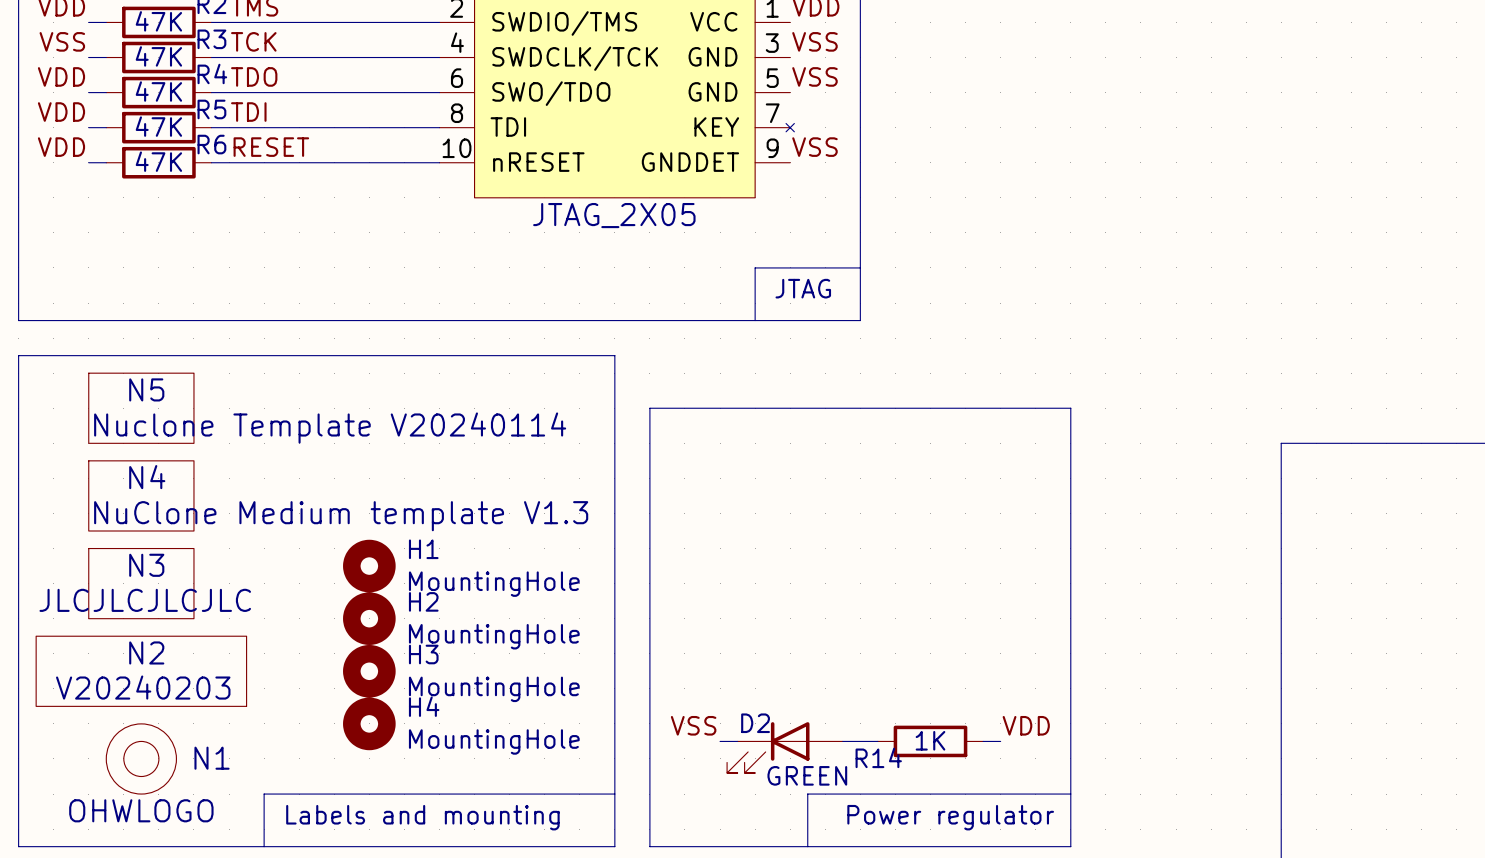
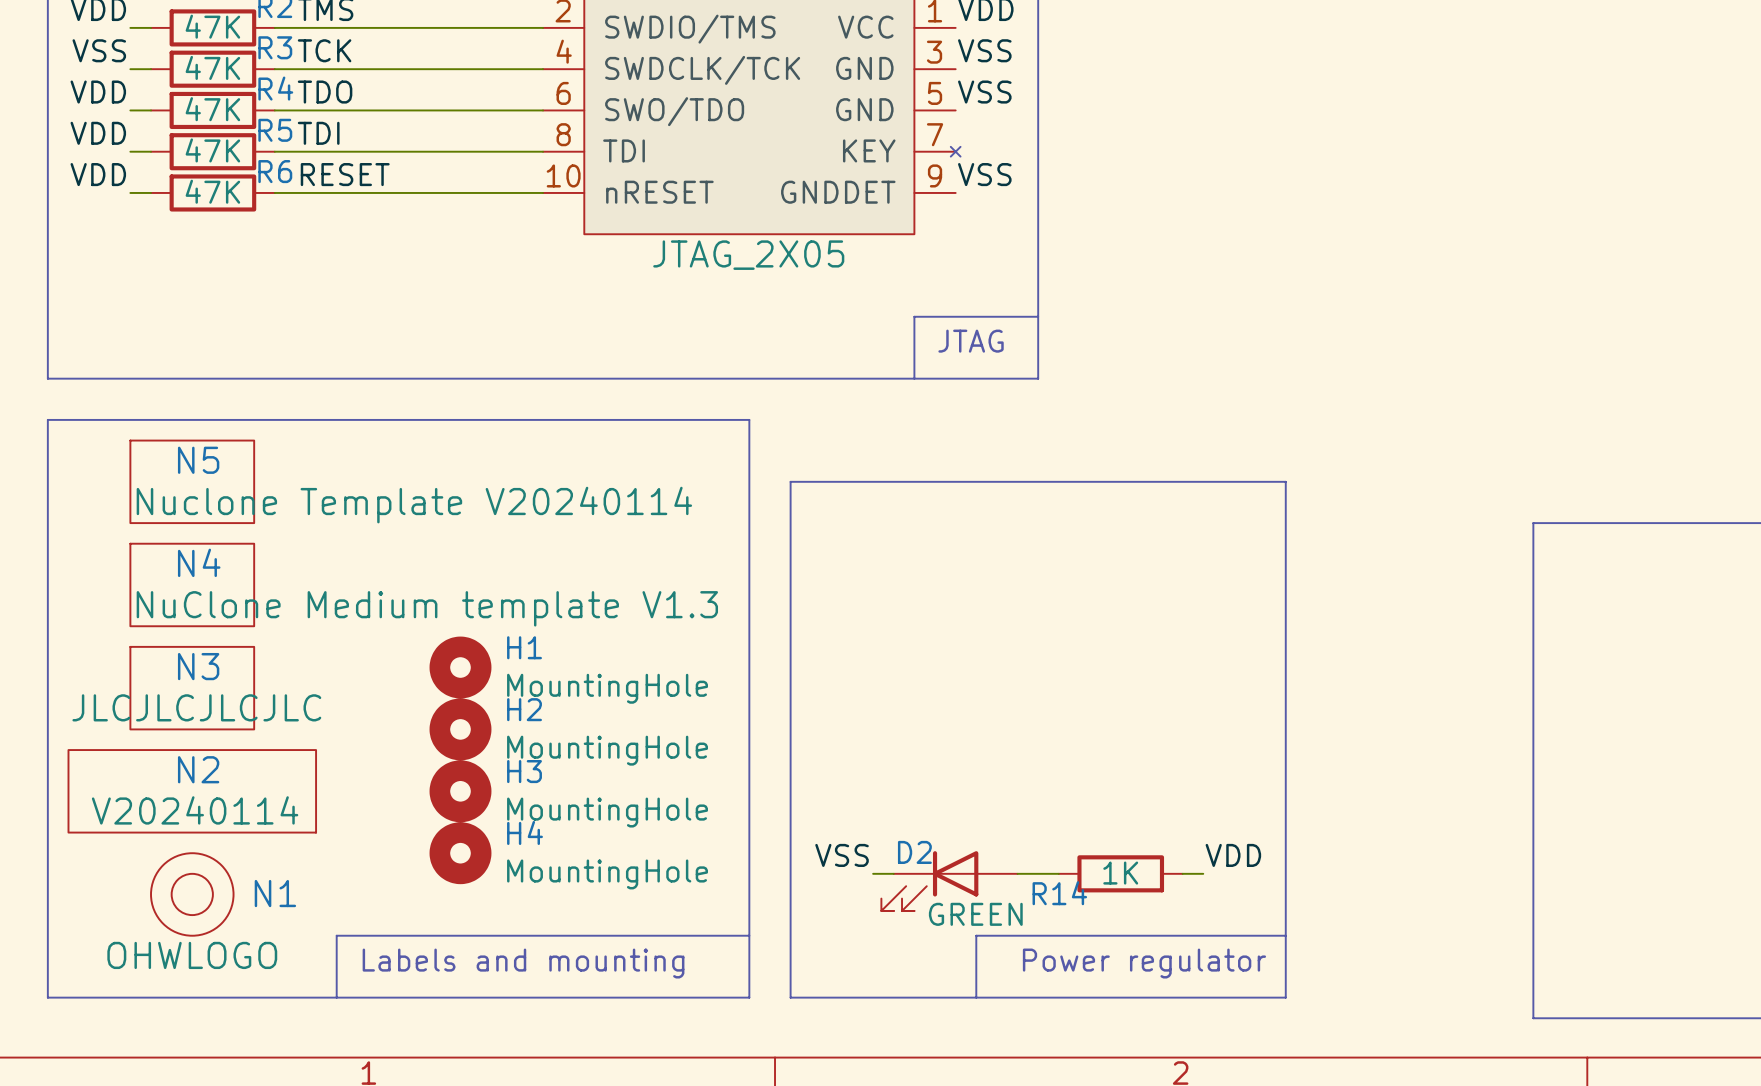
N2 value: V20240203 (143, 687) -> V20240114 (195, 810)

